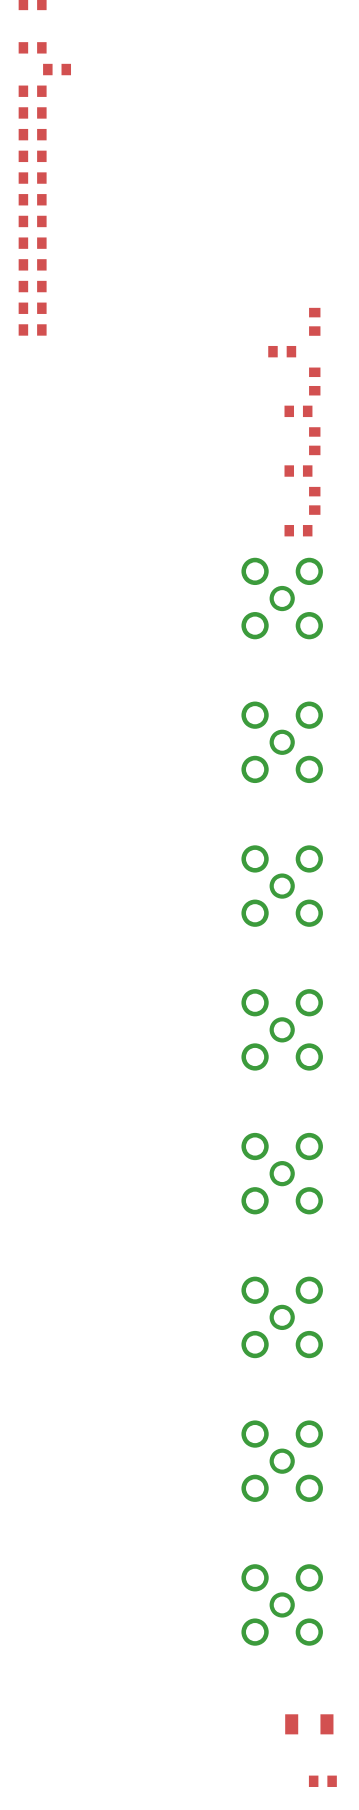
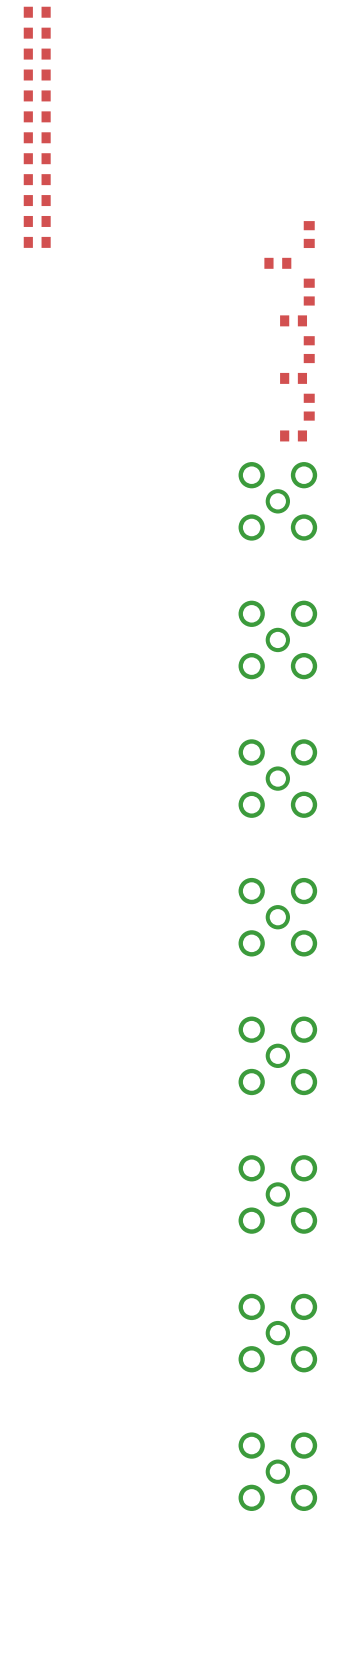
part: (309, 1724) -> none
part: (322, 1781) -> none

